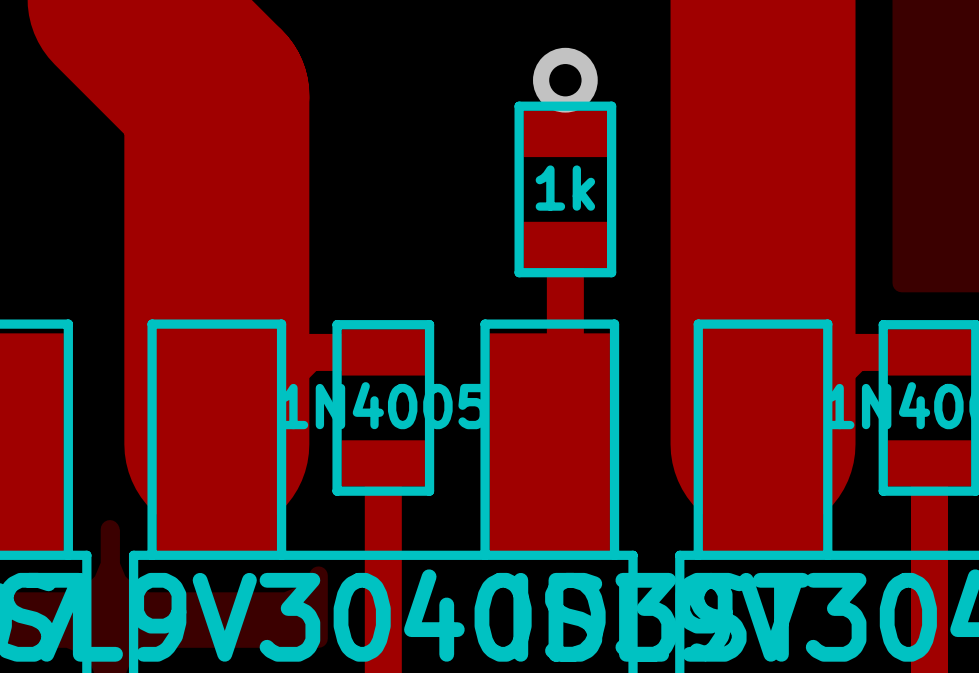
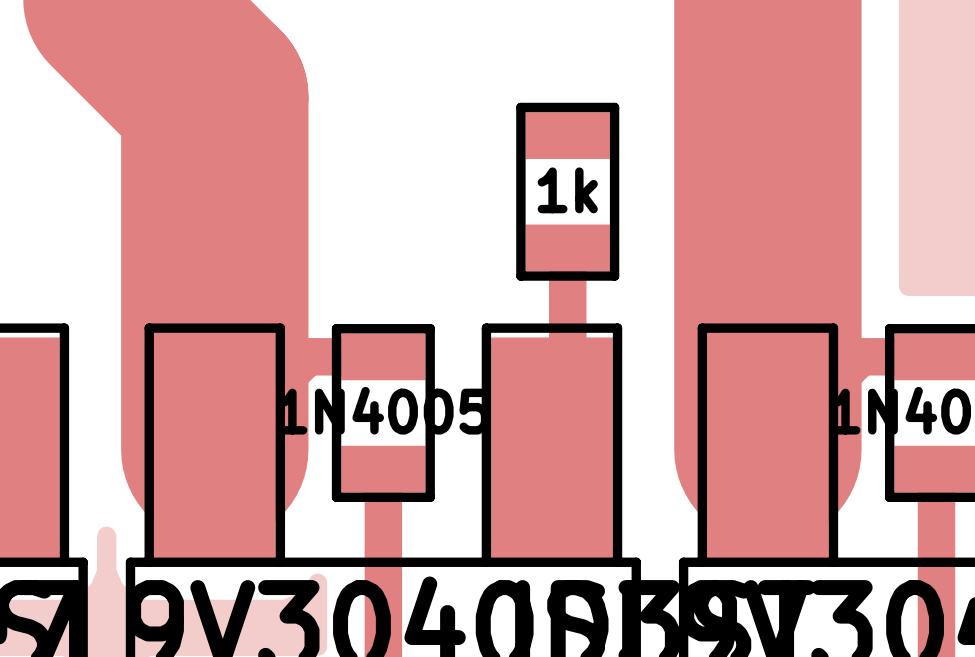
via: (565, 80) -> none

